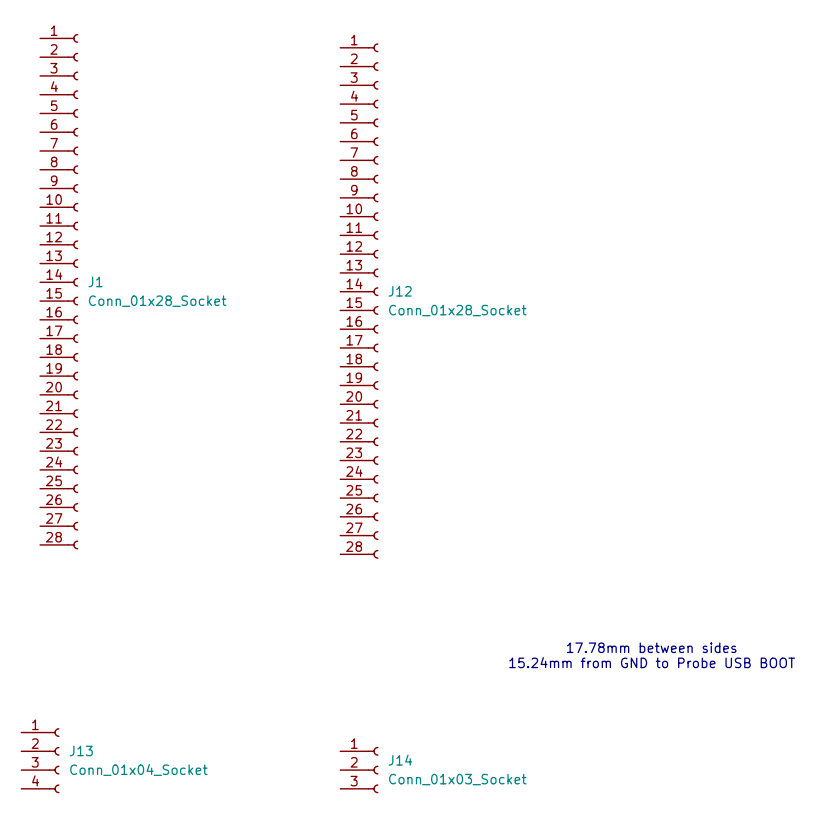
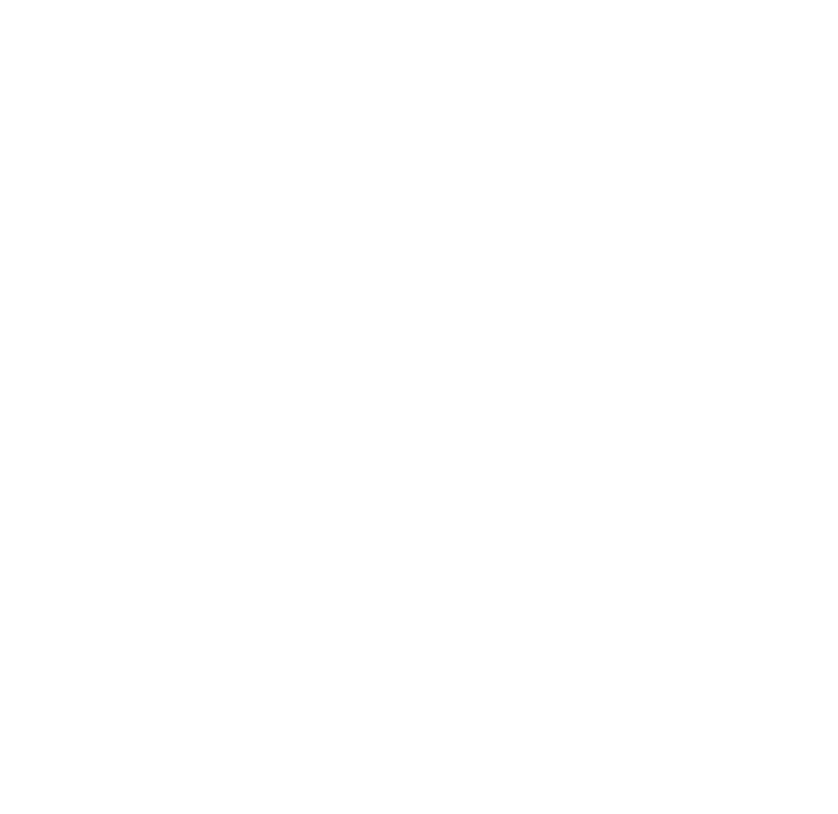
J1: Conn_01x28_Socket (59, 291) -> none
J12: Conn_01x28_Socket (359, 301) -> none
text: 17.78mm between sides (651, 647) -> none
text: 15.24mm from GND to Probe USB BOOT (652, 662) -> none
J13: Conn_01x04_Socket (40, 760) -> none
J14: Conn_01x03_Socket (359, 770) -> none

